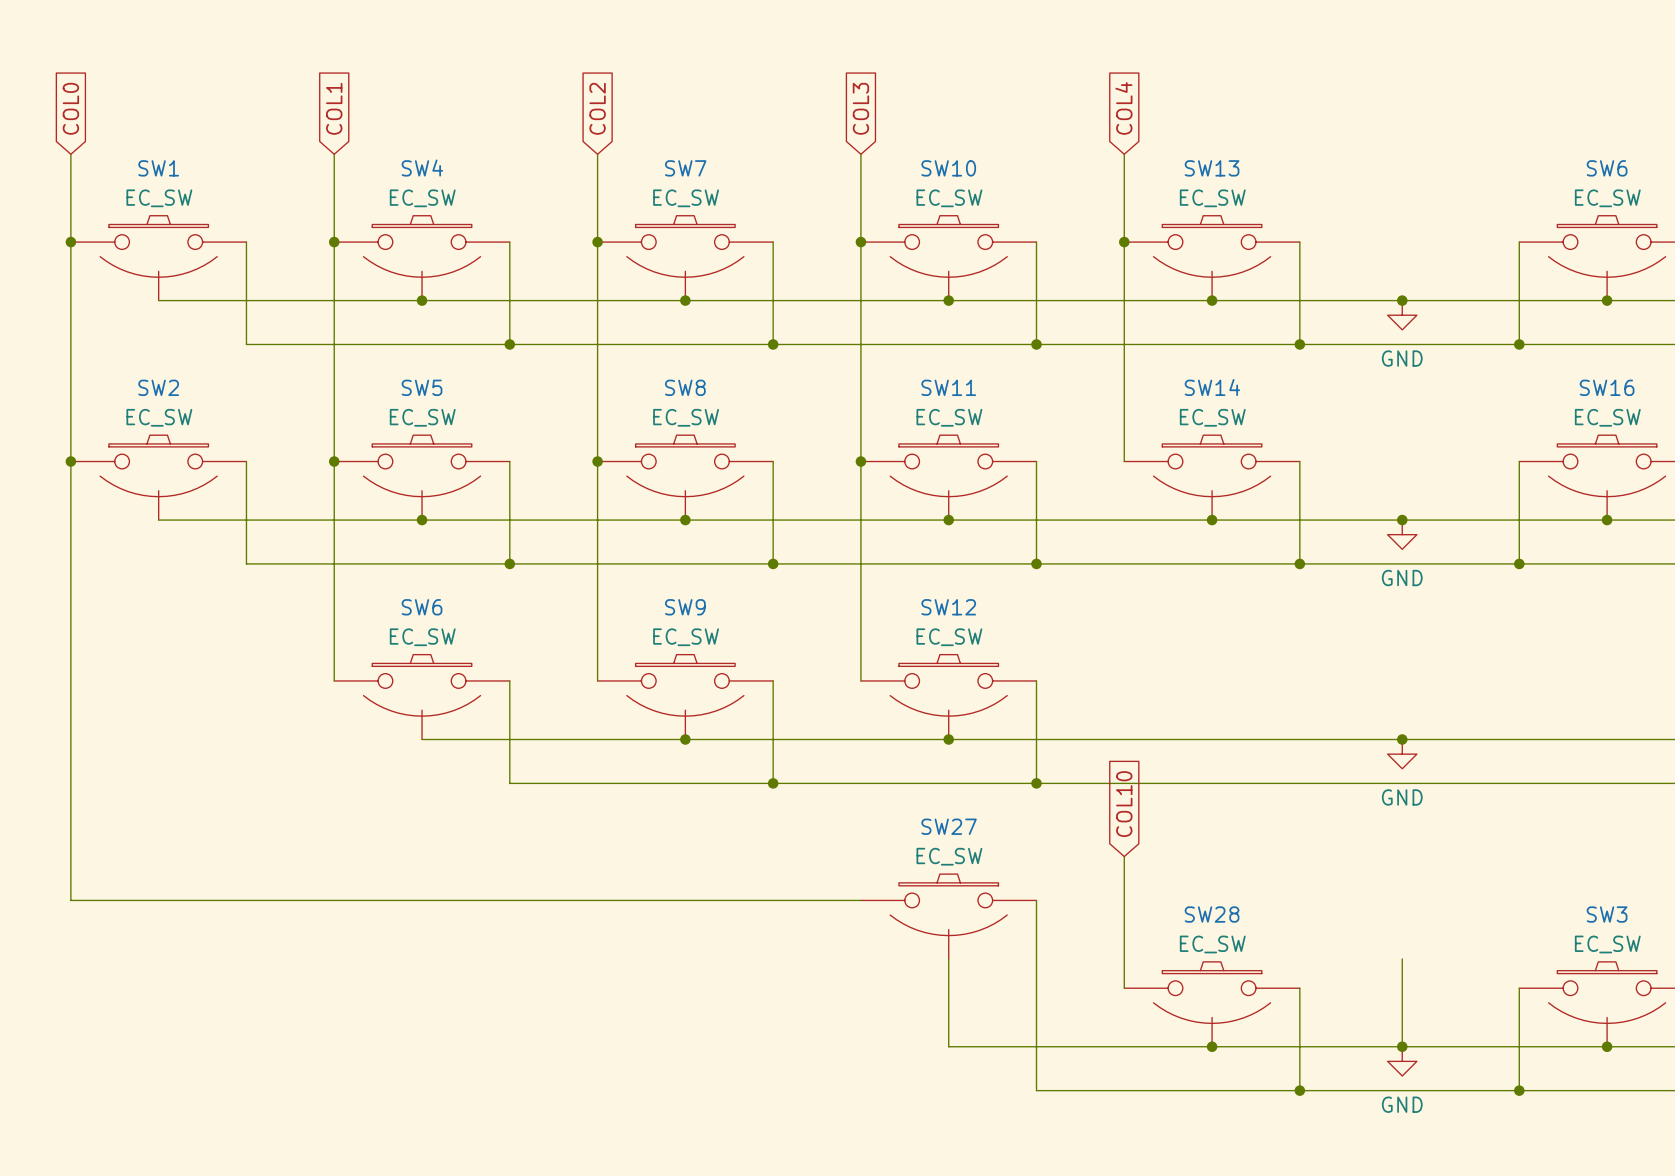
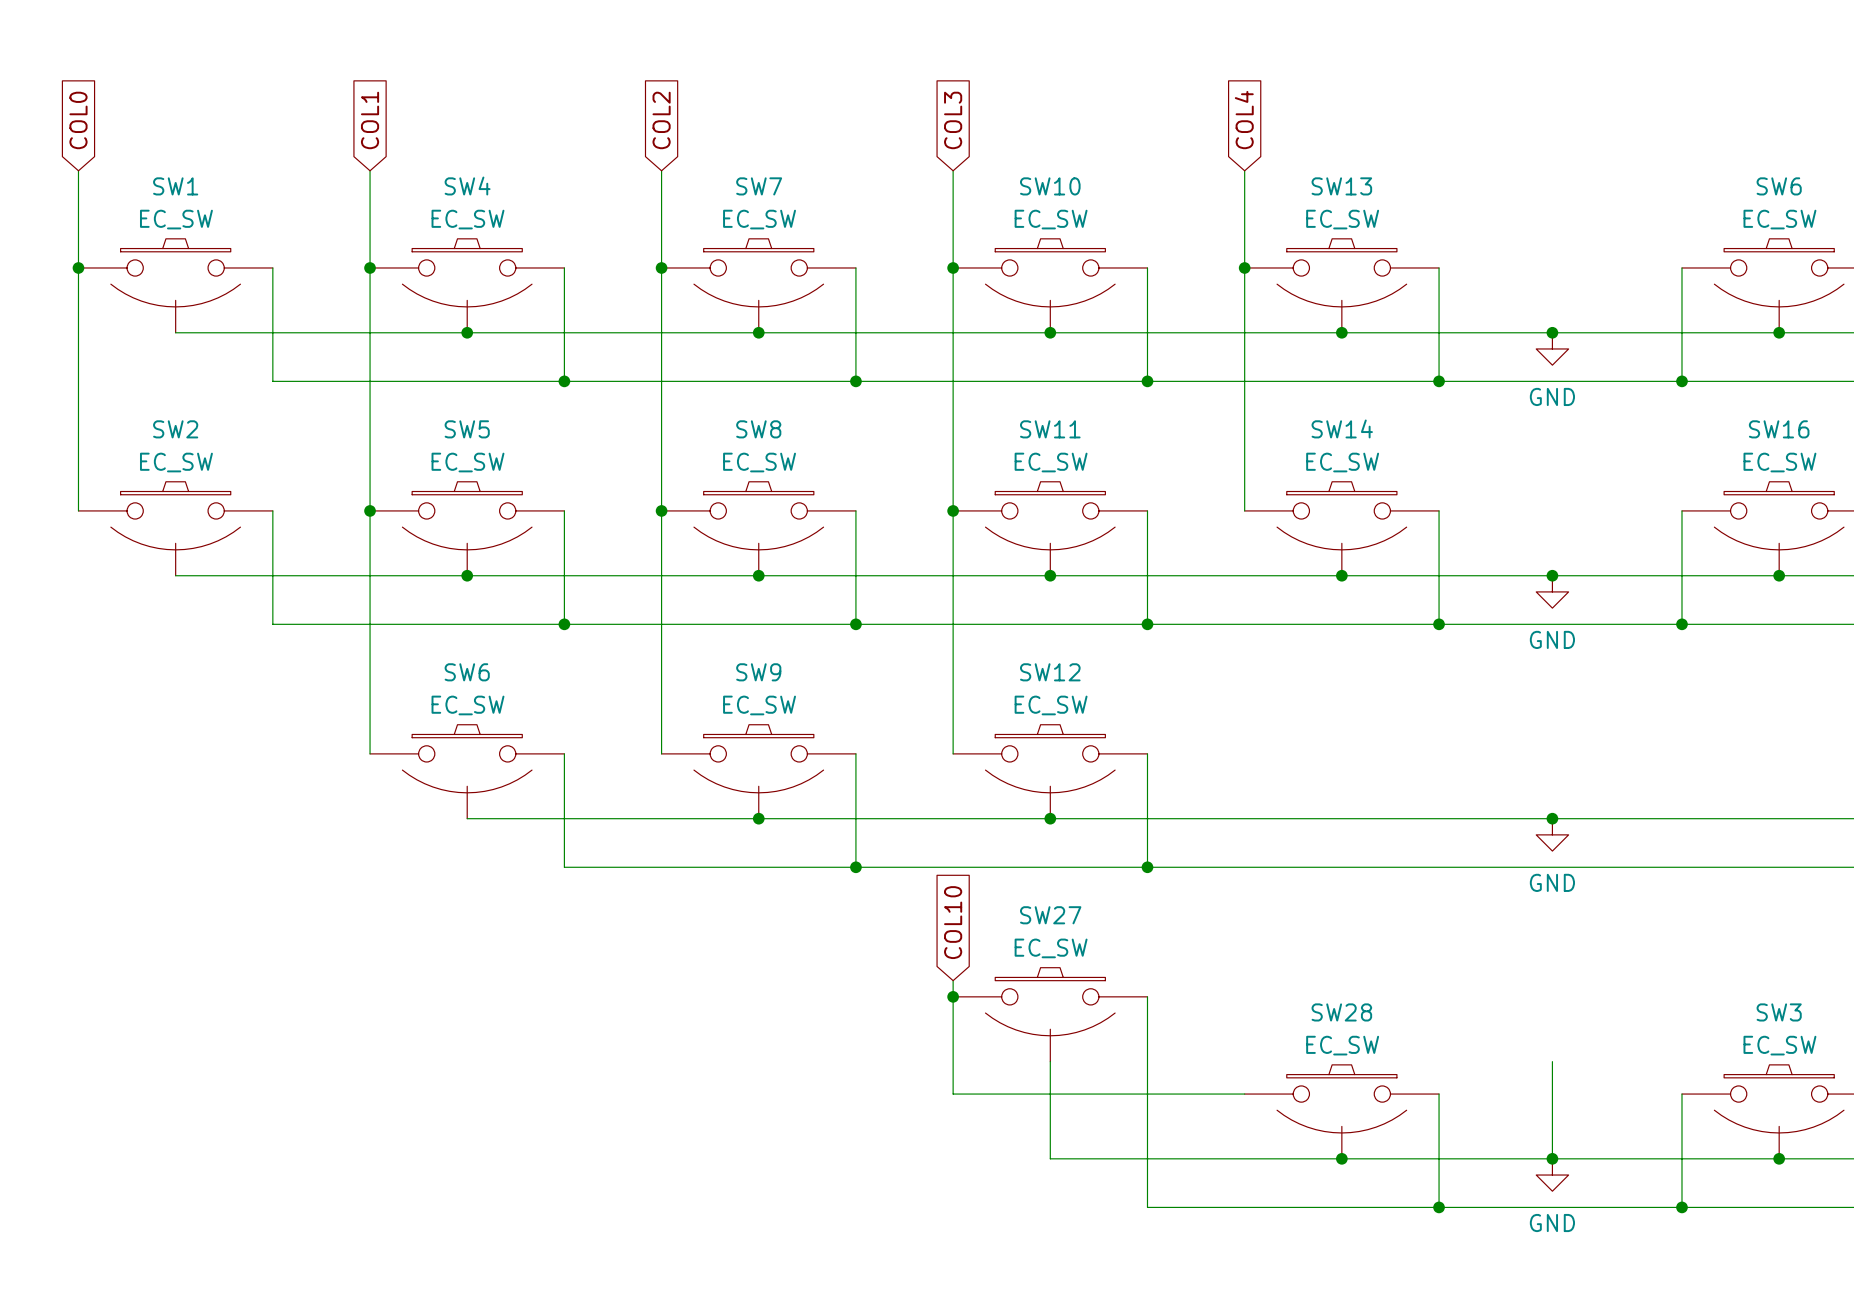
wire: (70, 461) (70, 900) (860, 900) -> none
junction: (70, 461) -> none
global label position: COL10 (1124, 804) -> COL10 (953, 922)
wire: (1124, 856) (1124, 988) -> (953, 980) (953, 1094) (1244, 1094)
junction: none -> (953, 996)

